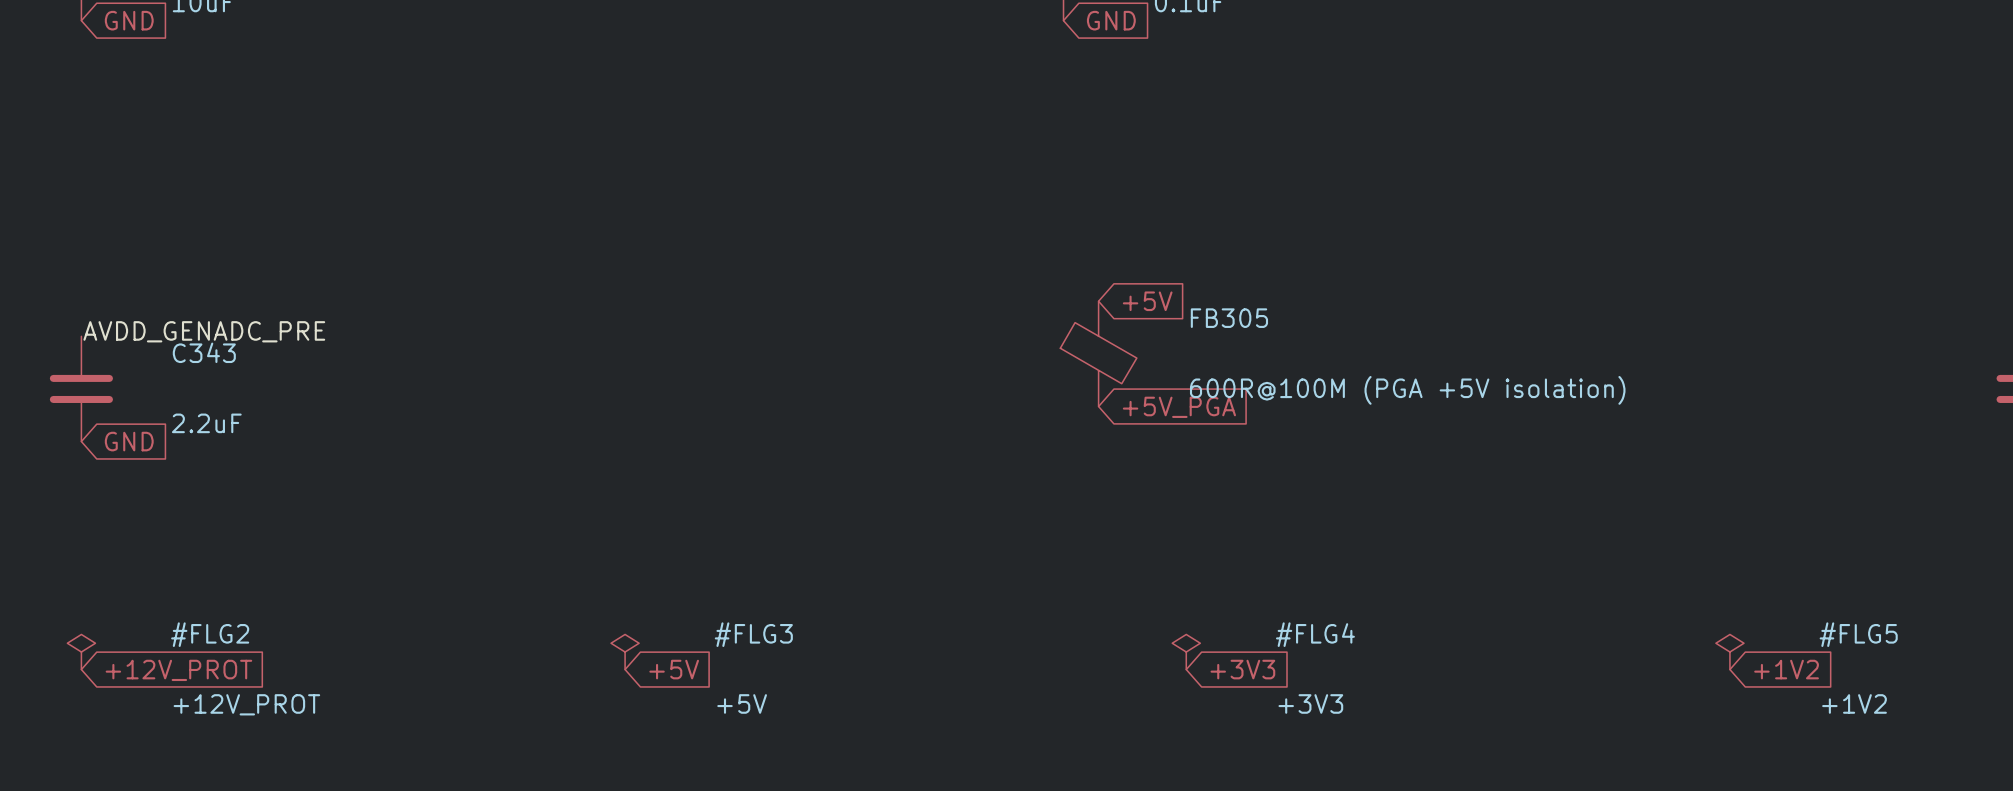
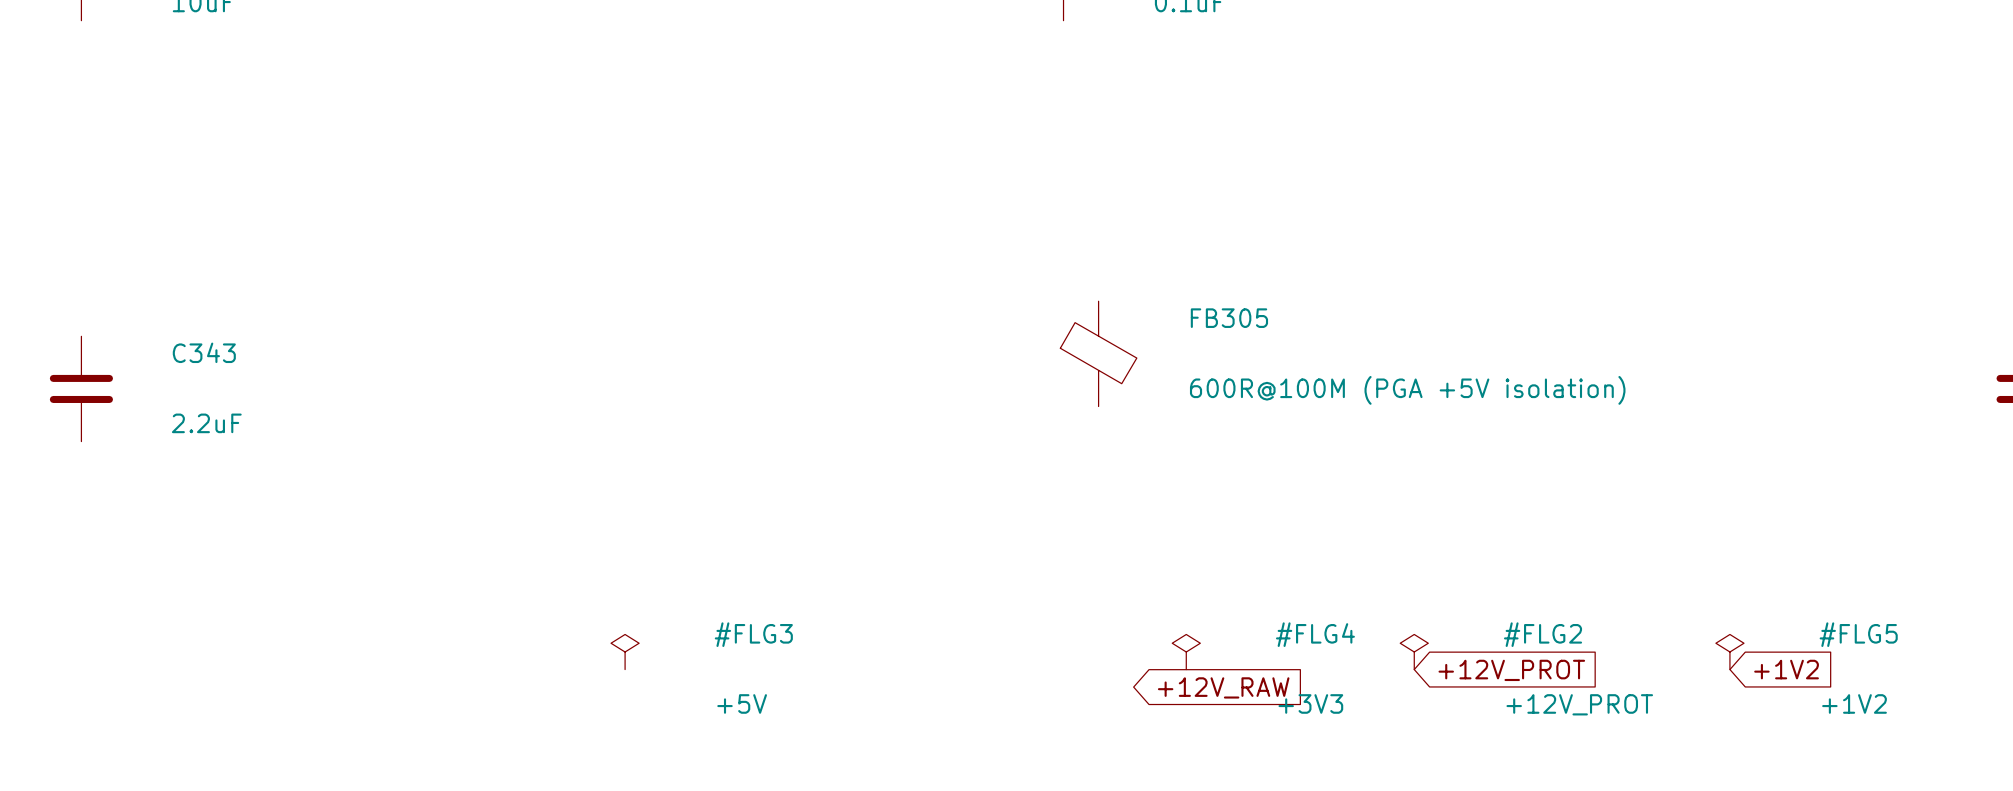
global label: GND (129, 20) -> none
global label: GND (1111, 20) -> none
global label: +5V (1147, 301) -> none
label: AVDD_GENADC_PRE (204, 331) -> none
global label: +5V_PGA (1179, 407) -> none
global label: GND (129, 441) -> none
#FLG2 position: +12V_PROT (81, 652) -> +12V_PROT (1414, 652)
global label: +5V (674, 669) -> none
global label: +3V3 (1242, 669) -> none
global label: +12V_PROT (178, 670) -> none
global label: none -> +12V_PROT (1511, 670)
global label: none -> +12V_RAW (1223, 687)

